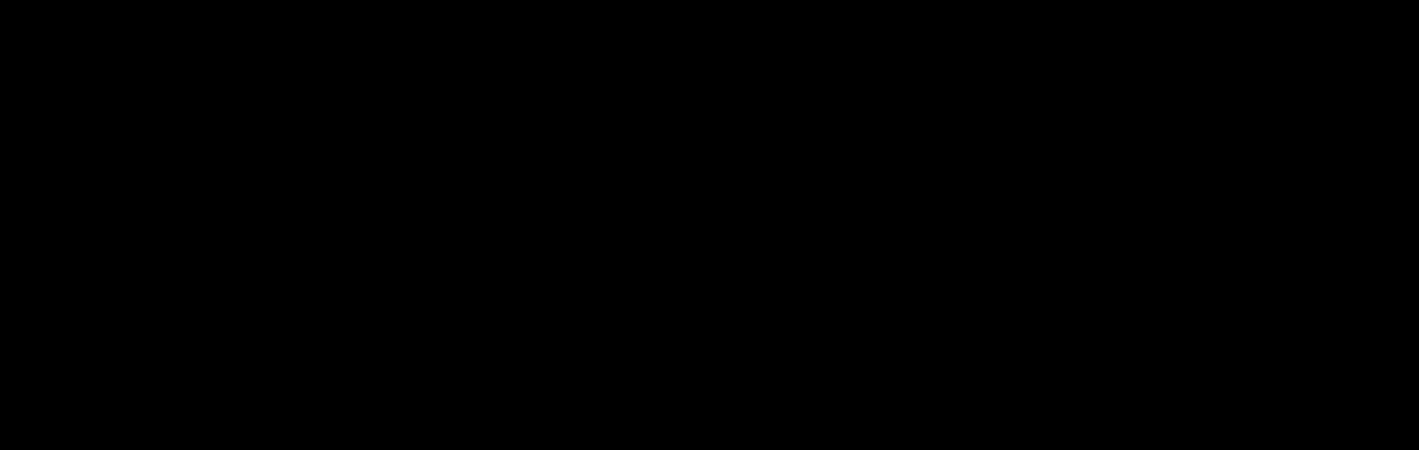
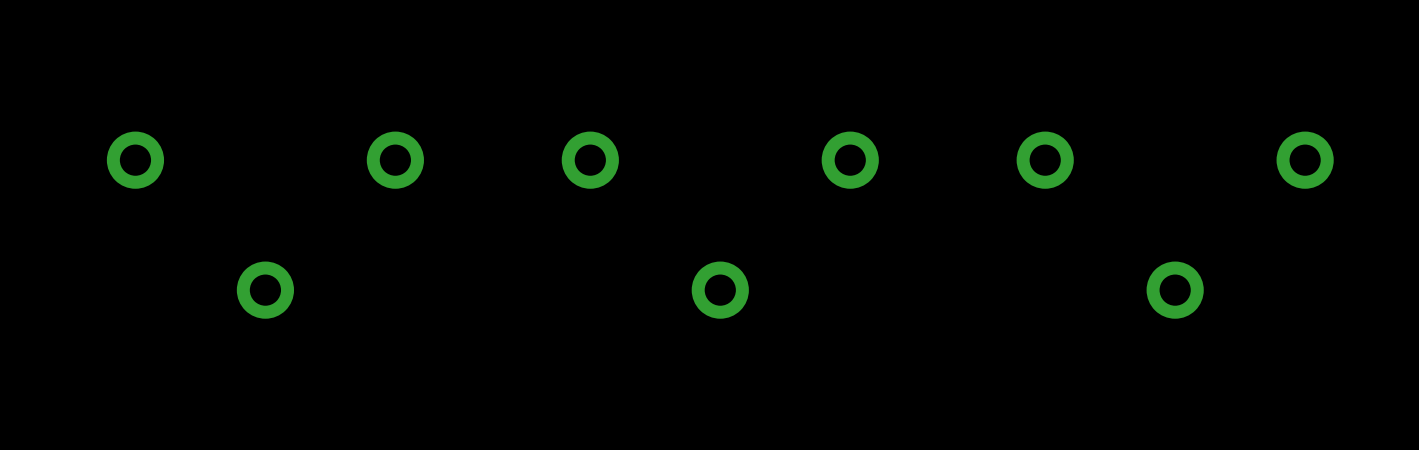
part: none -> (265, 225)
part: none -> (720, 225)
part: none -> (1175, 225)

